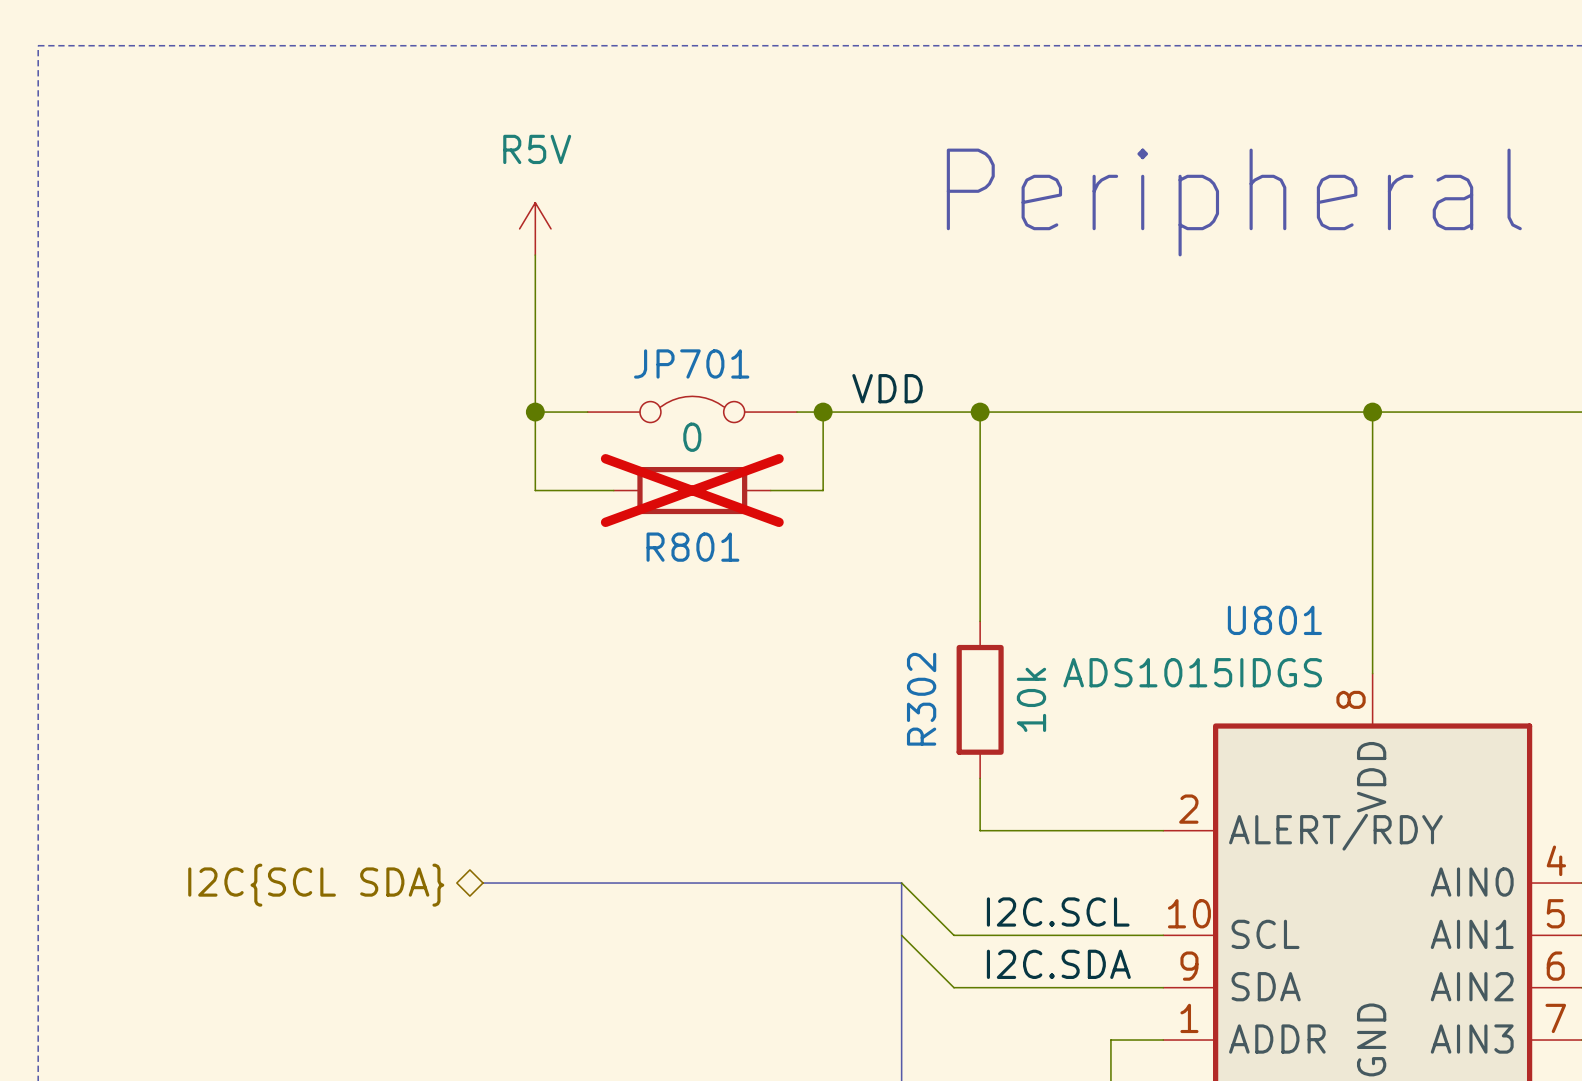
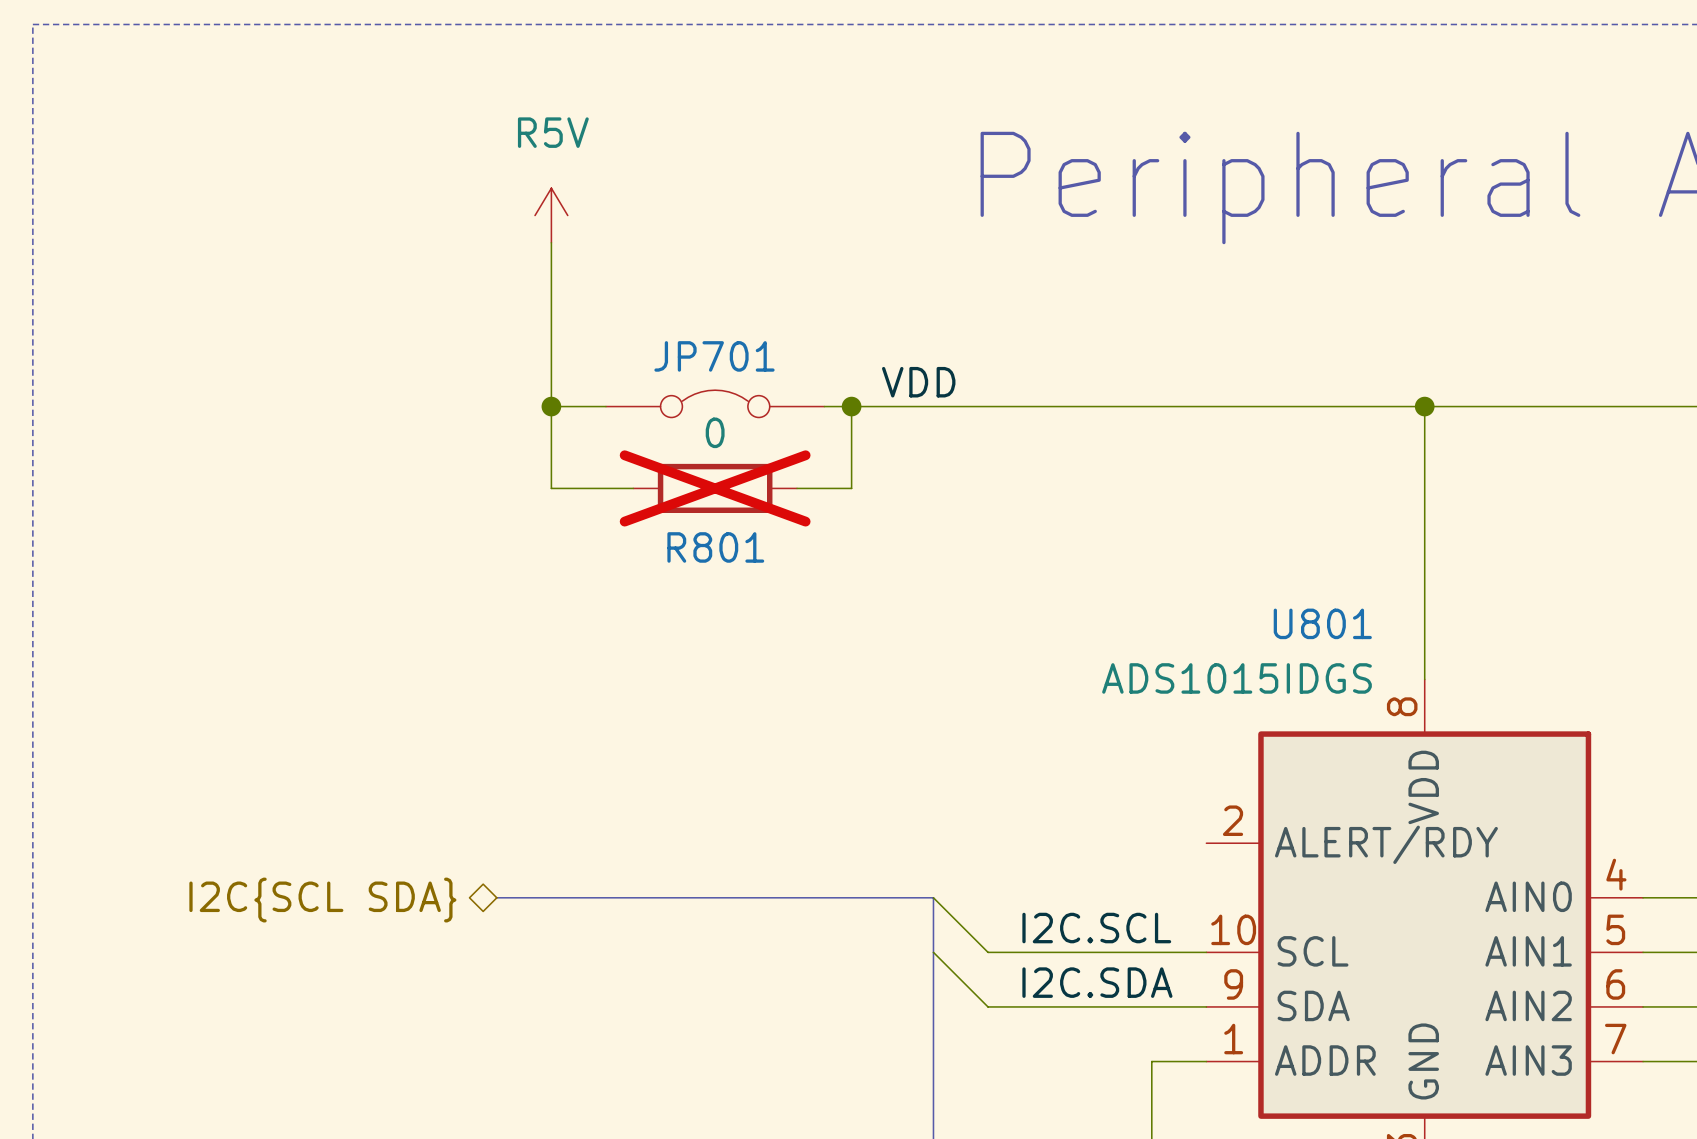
wire: (980, 412) (980, 621) -> none
junction: (980, 412) -> none
R302: 10k (980, 699) -> none
wire: (980, 778) (980, 830) (1163, 830) -> none

